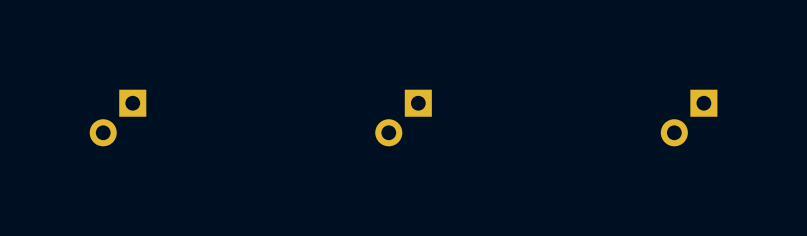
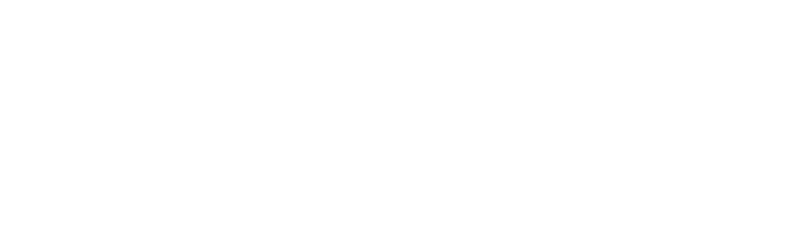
part: (118, 118) -> none
part: (403, 118) -> none
part: (689, 118) -> none

